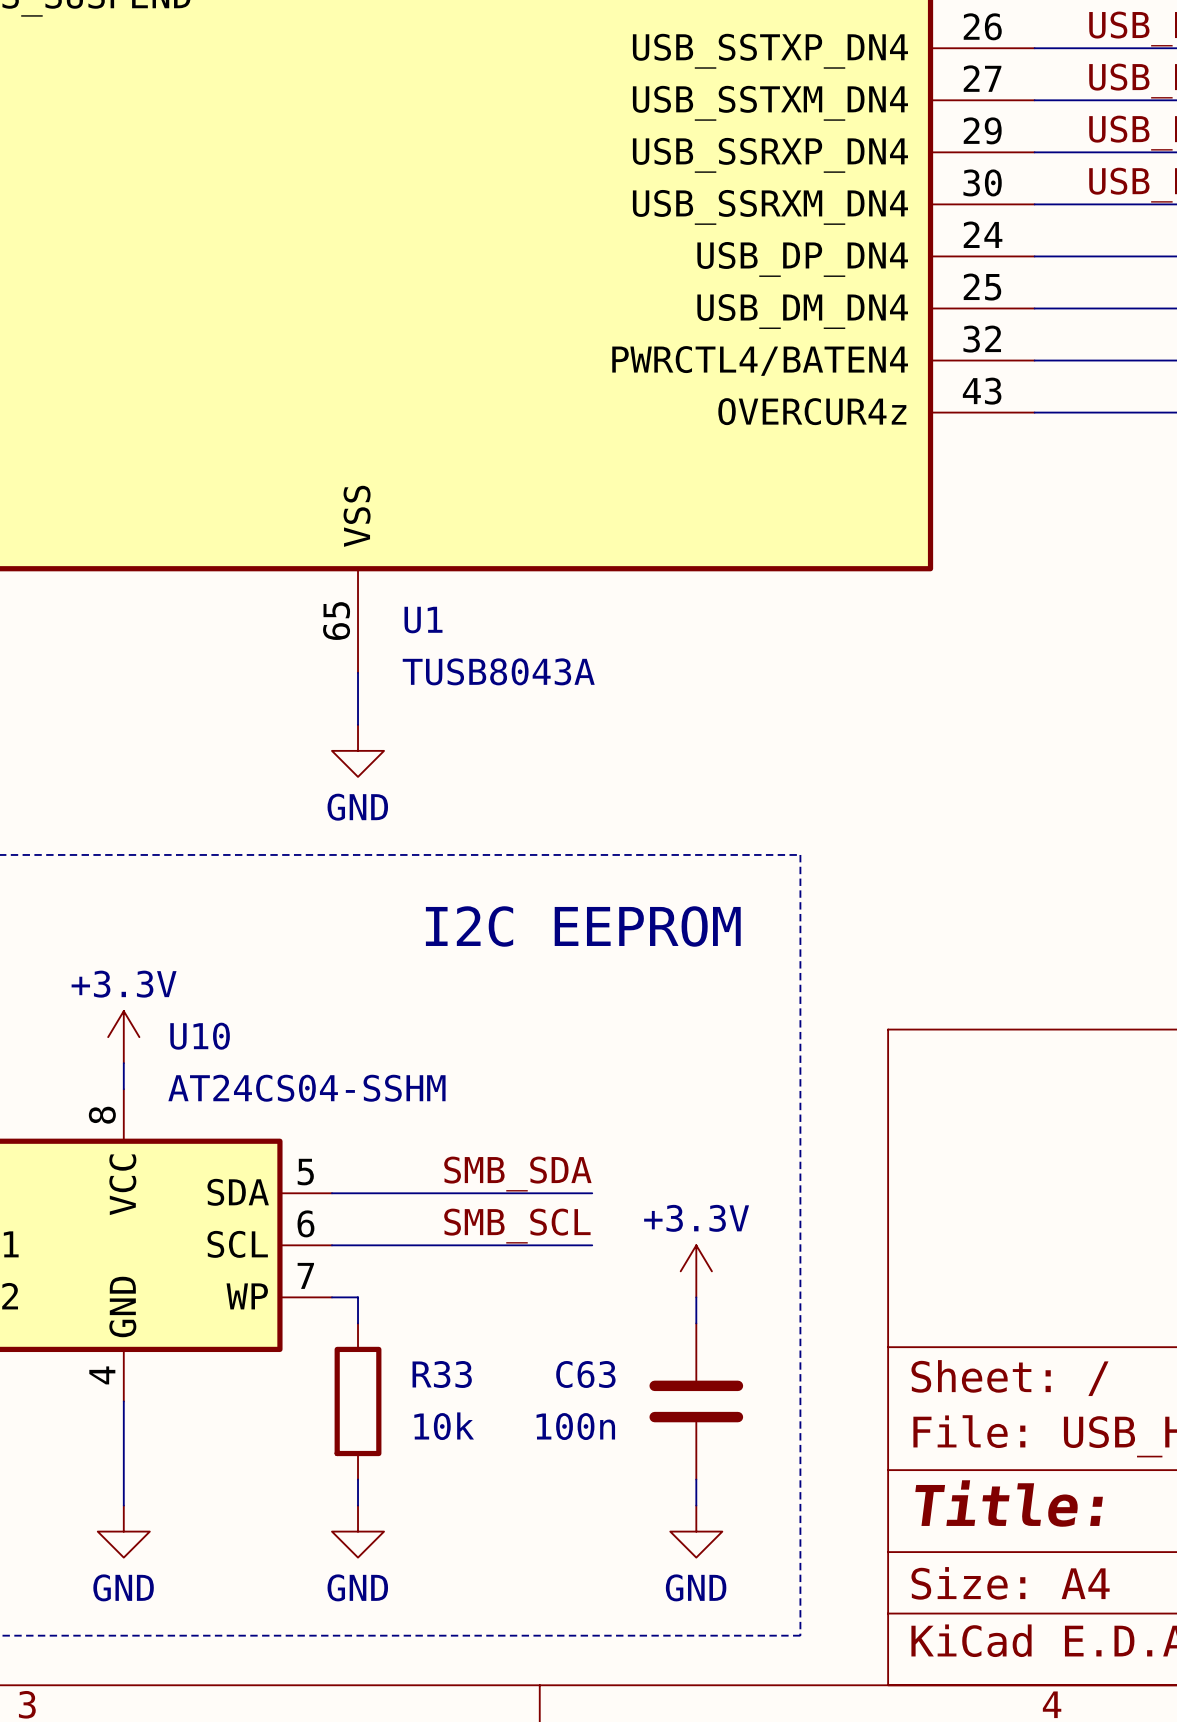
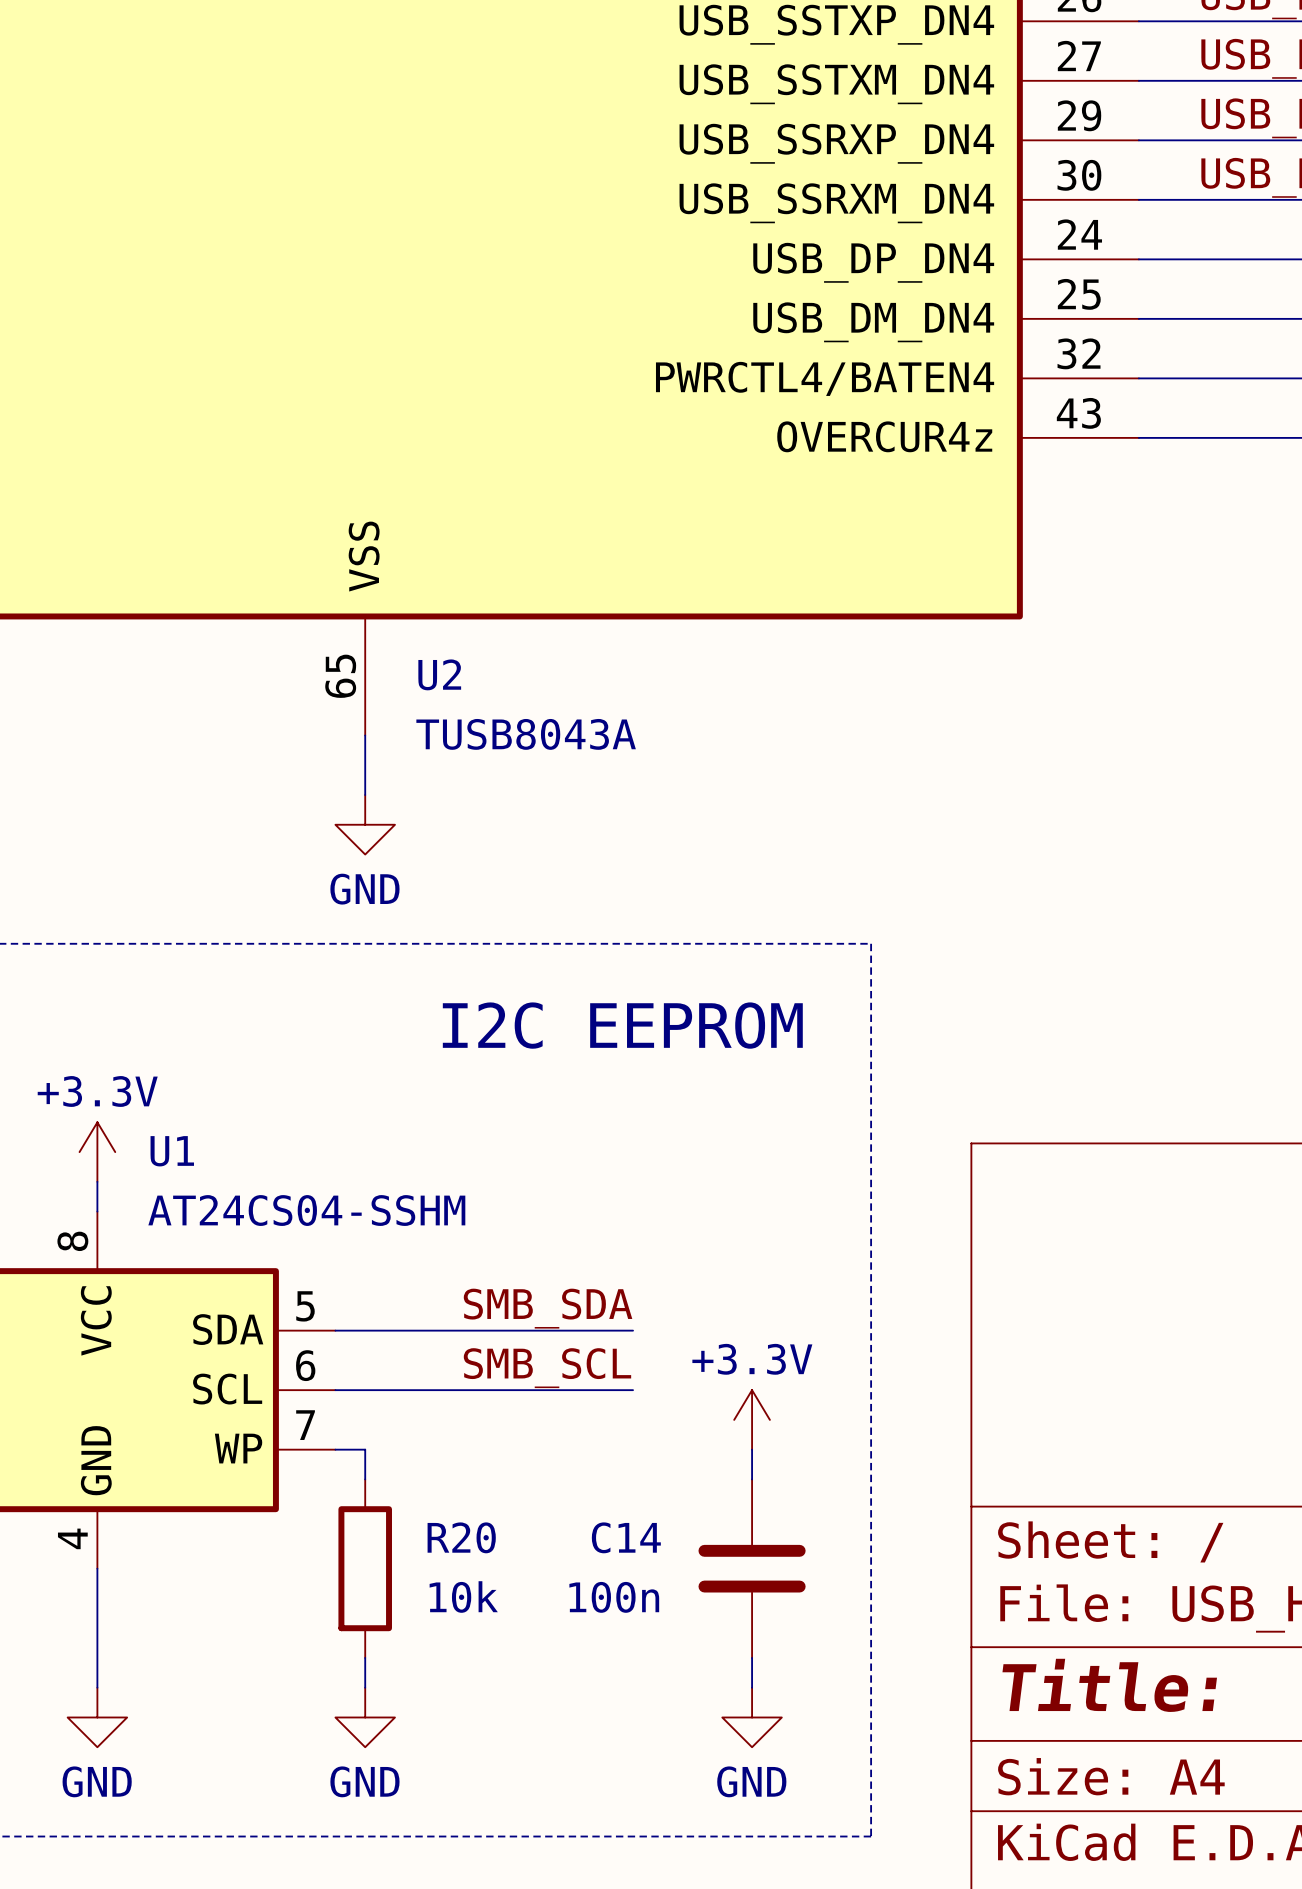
U1 name: U1 (423, 620) -> U2 (439, 674)
U10 name: U10 (200, 1036) -> U1 (172, 1151)
R33 name: R33 (442, 1374) -> R20 (461, 1537)
C63 name: C63 (585, 1374) -> C14 (626, 1537)

